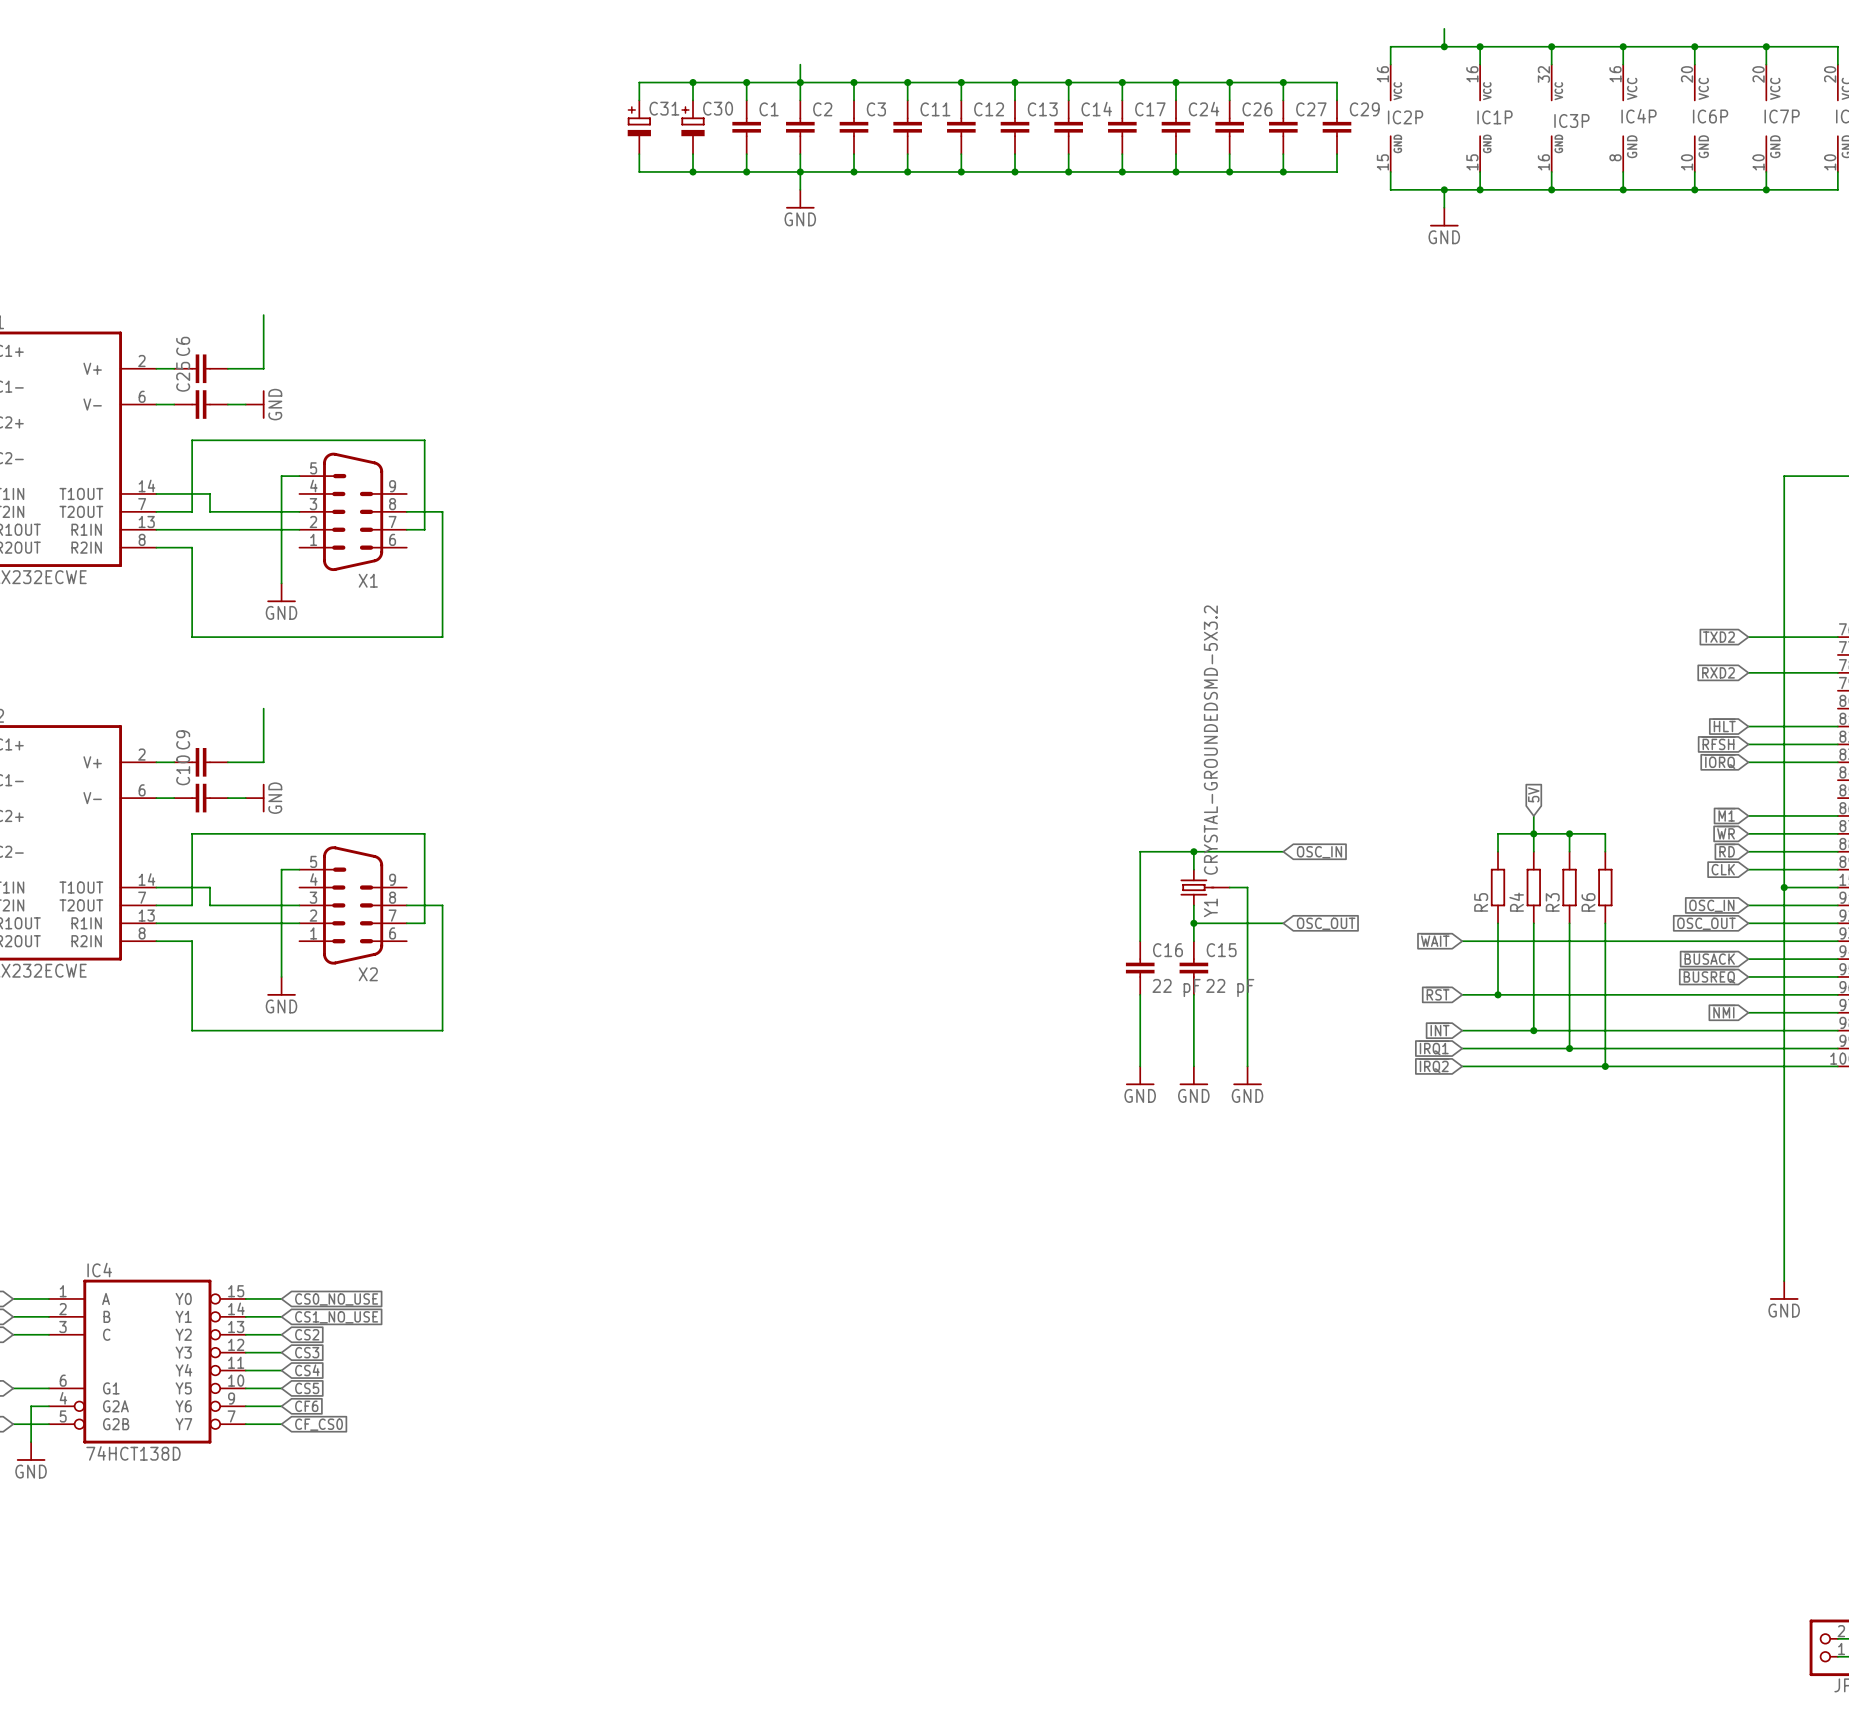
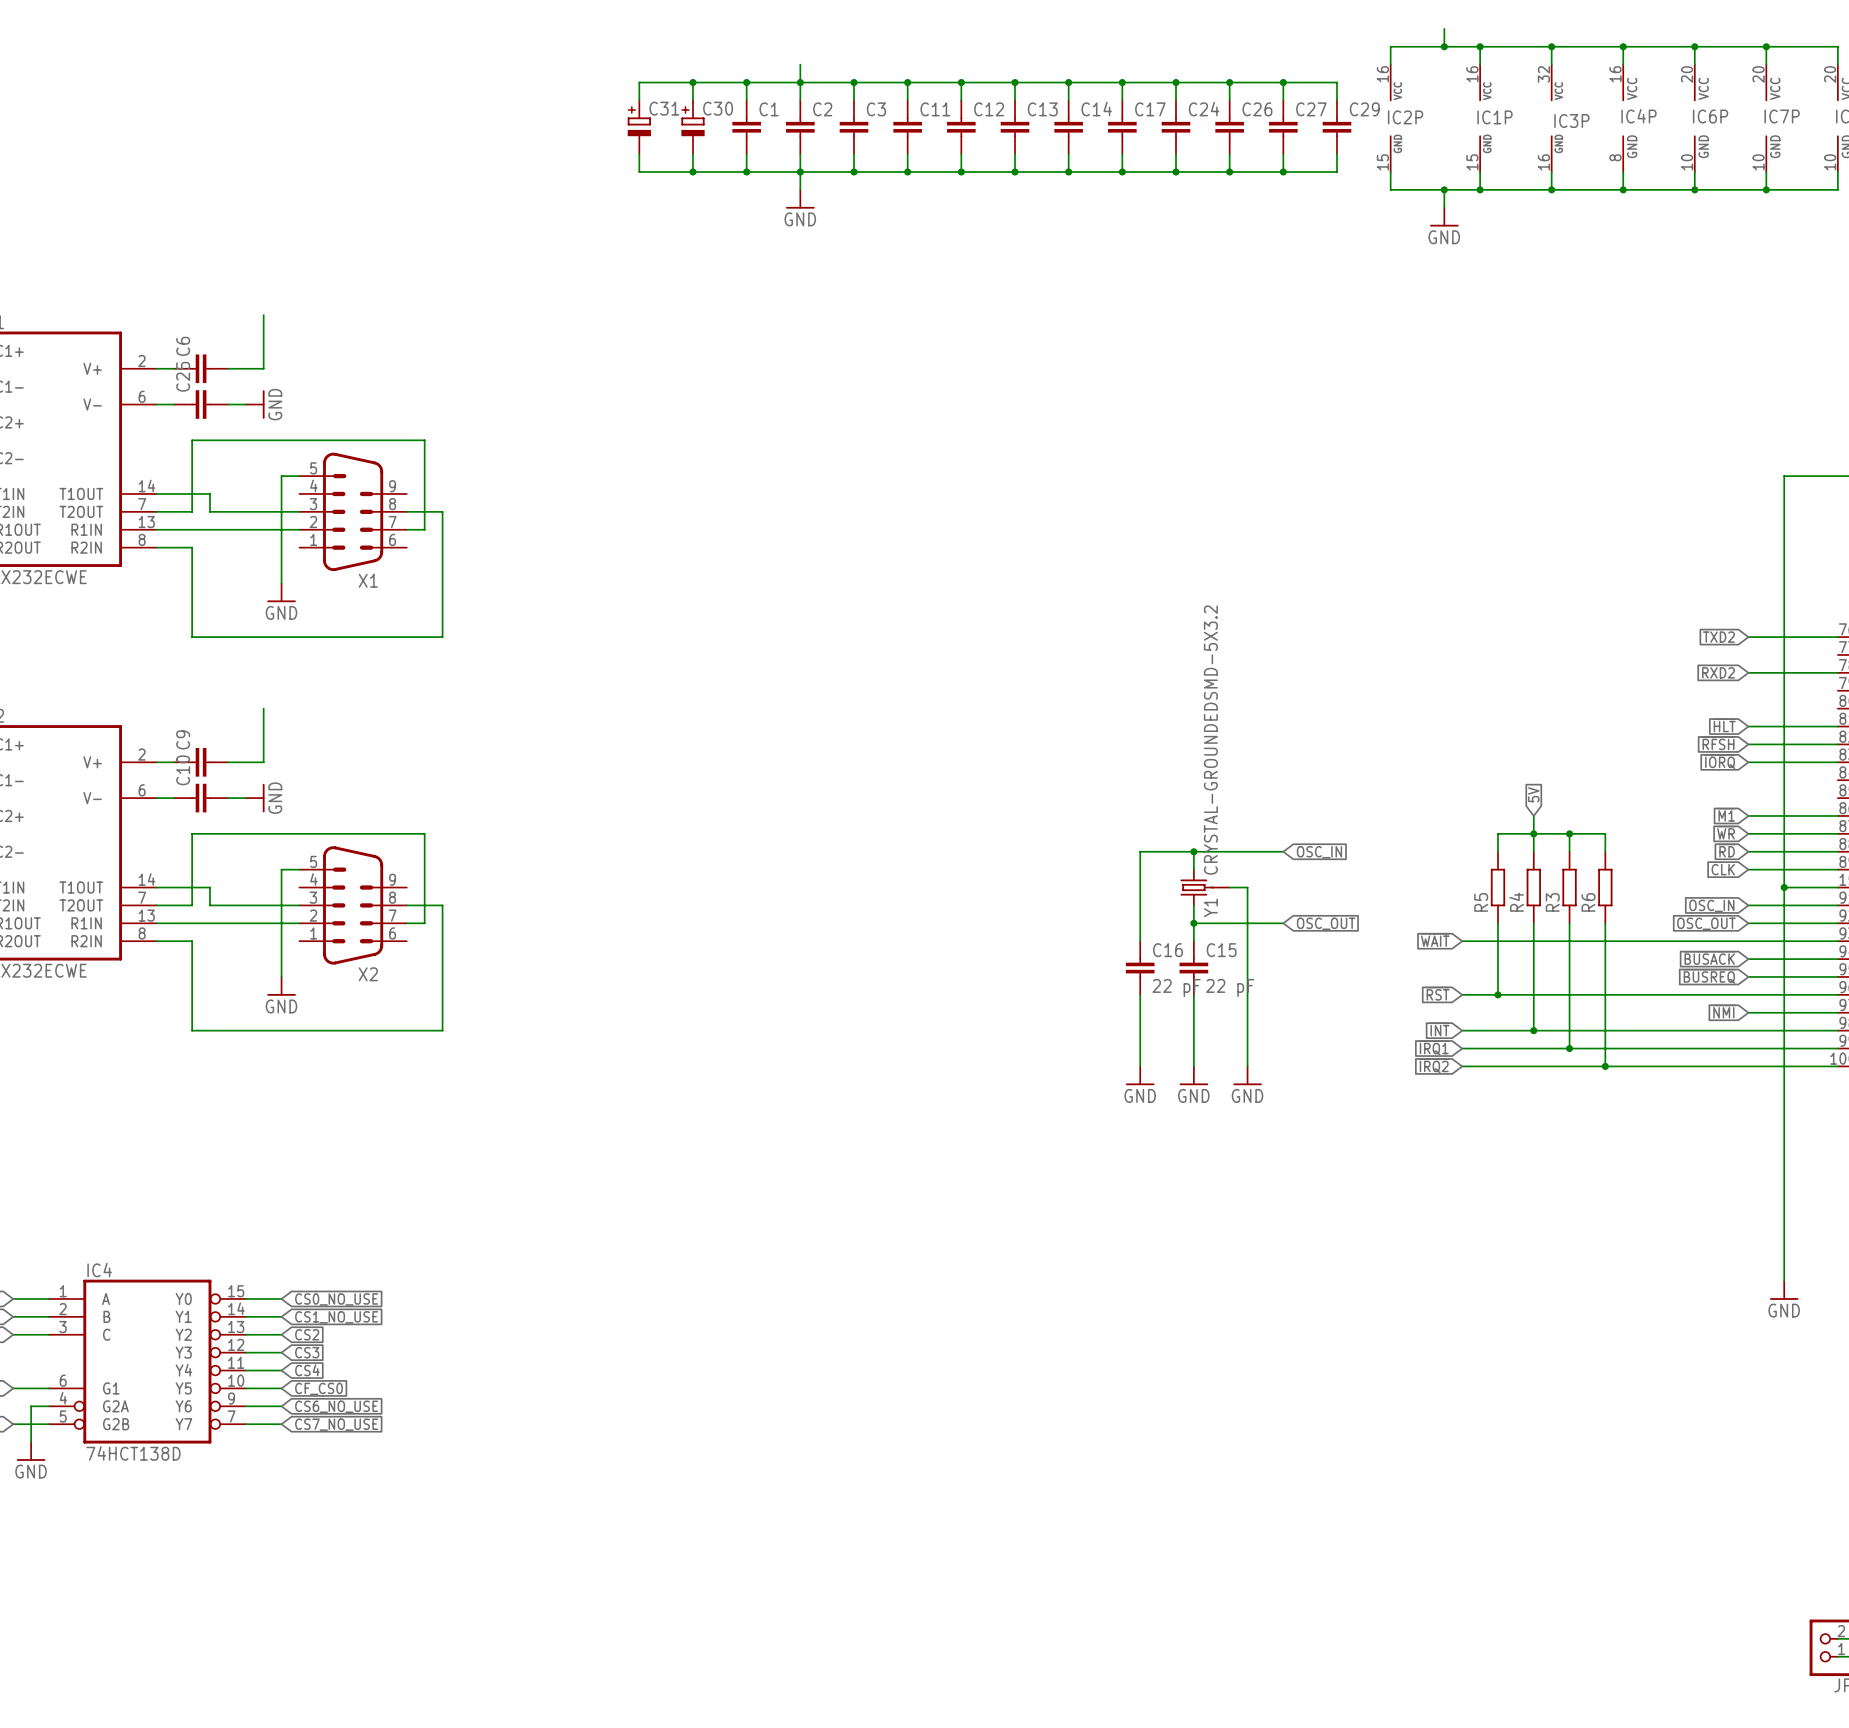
global label: CS5 (307, 1388) -> CF_CS0 (319, 1388)
global label: CF6 (306, 1406) -> CS6_NO_USE (336, 1406)
global label: CF_CS0 (319, 1424) -> CS7_NO_USE (336, 1424)

